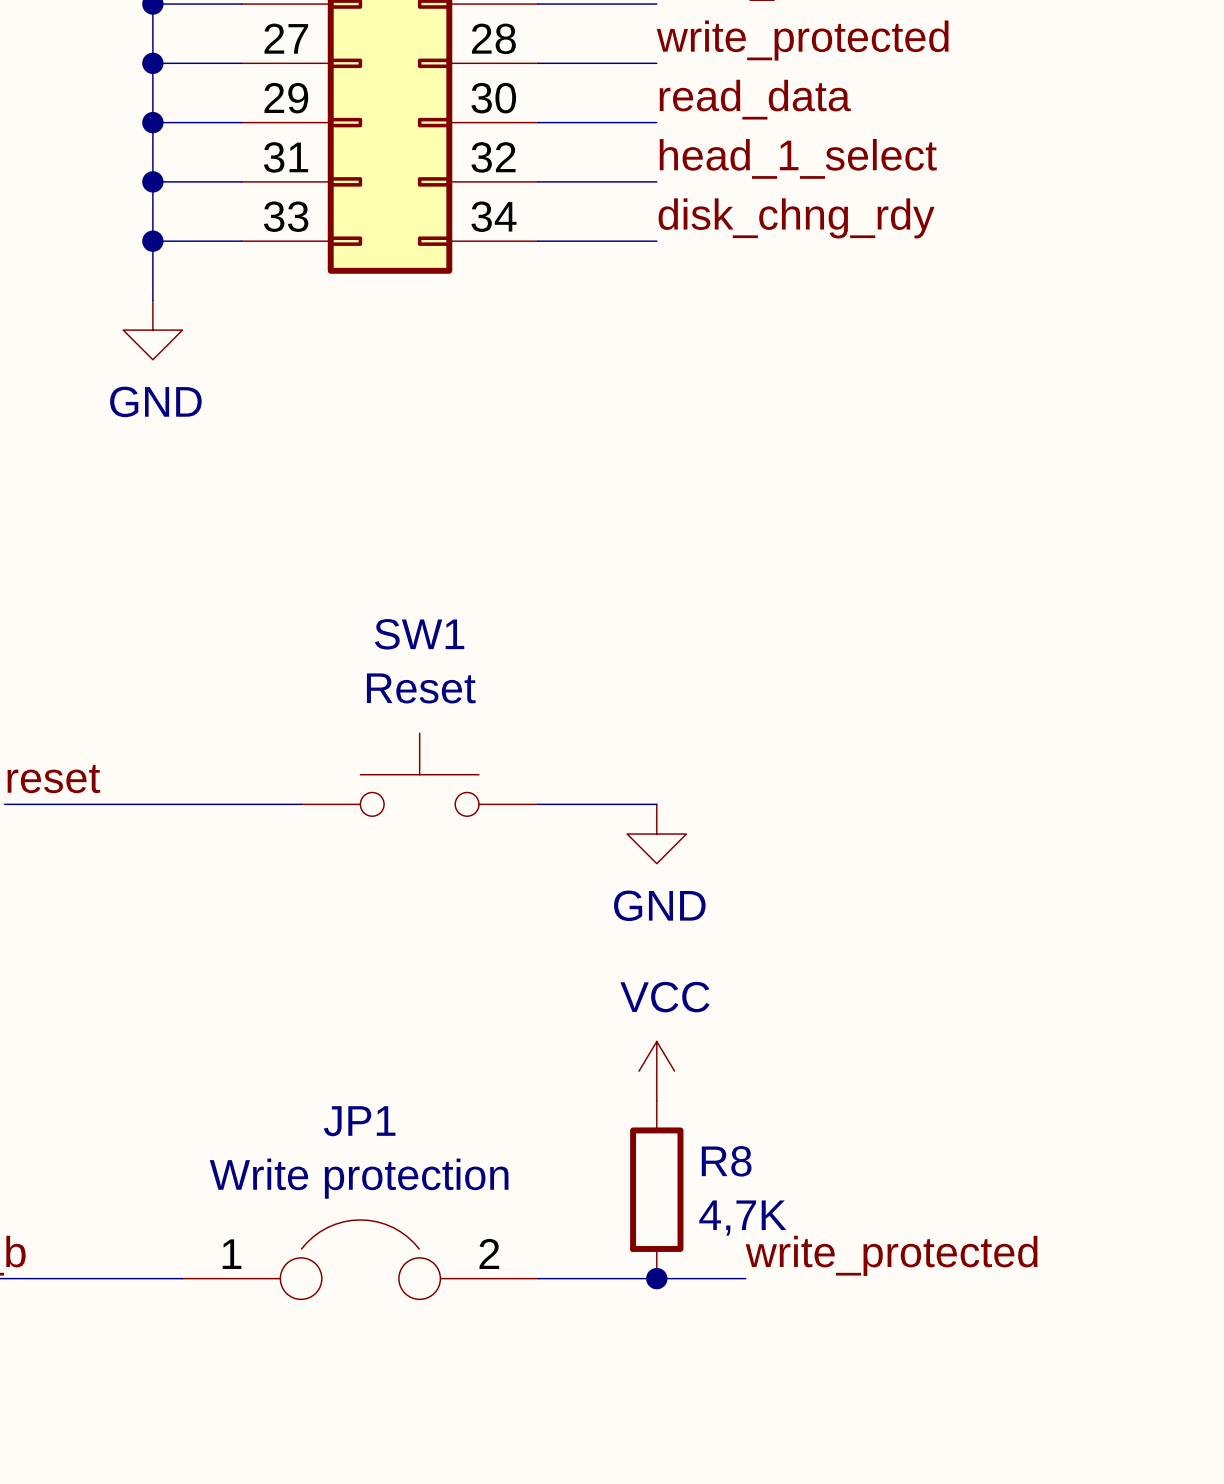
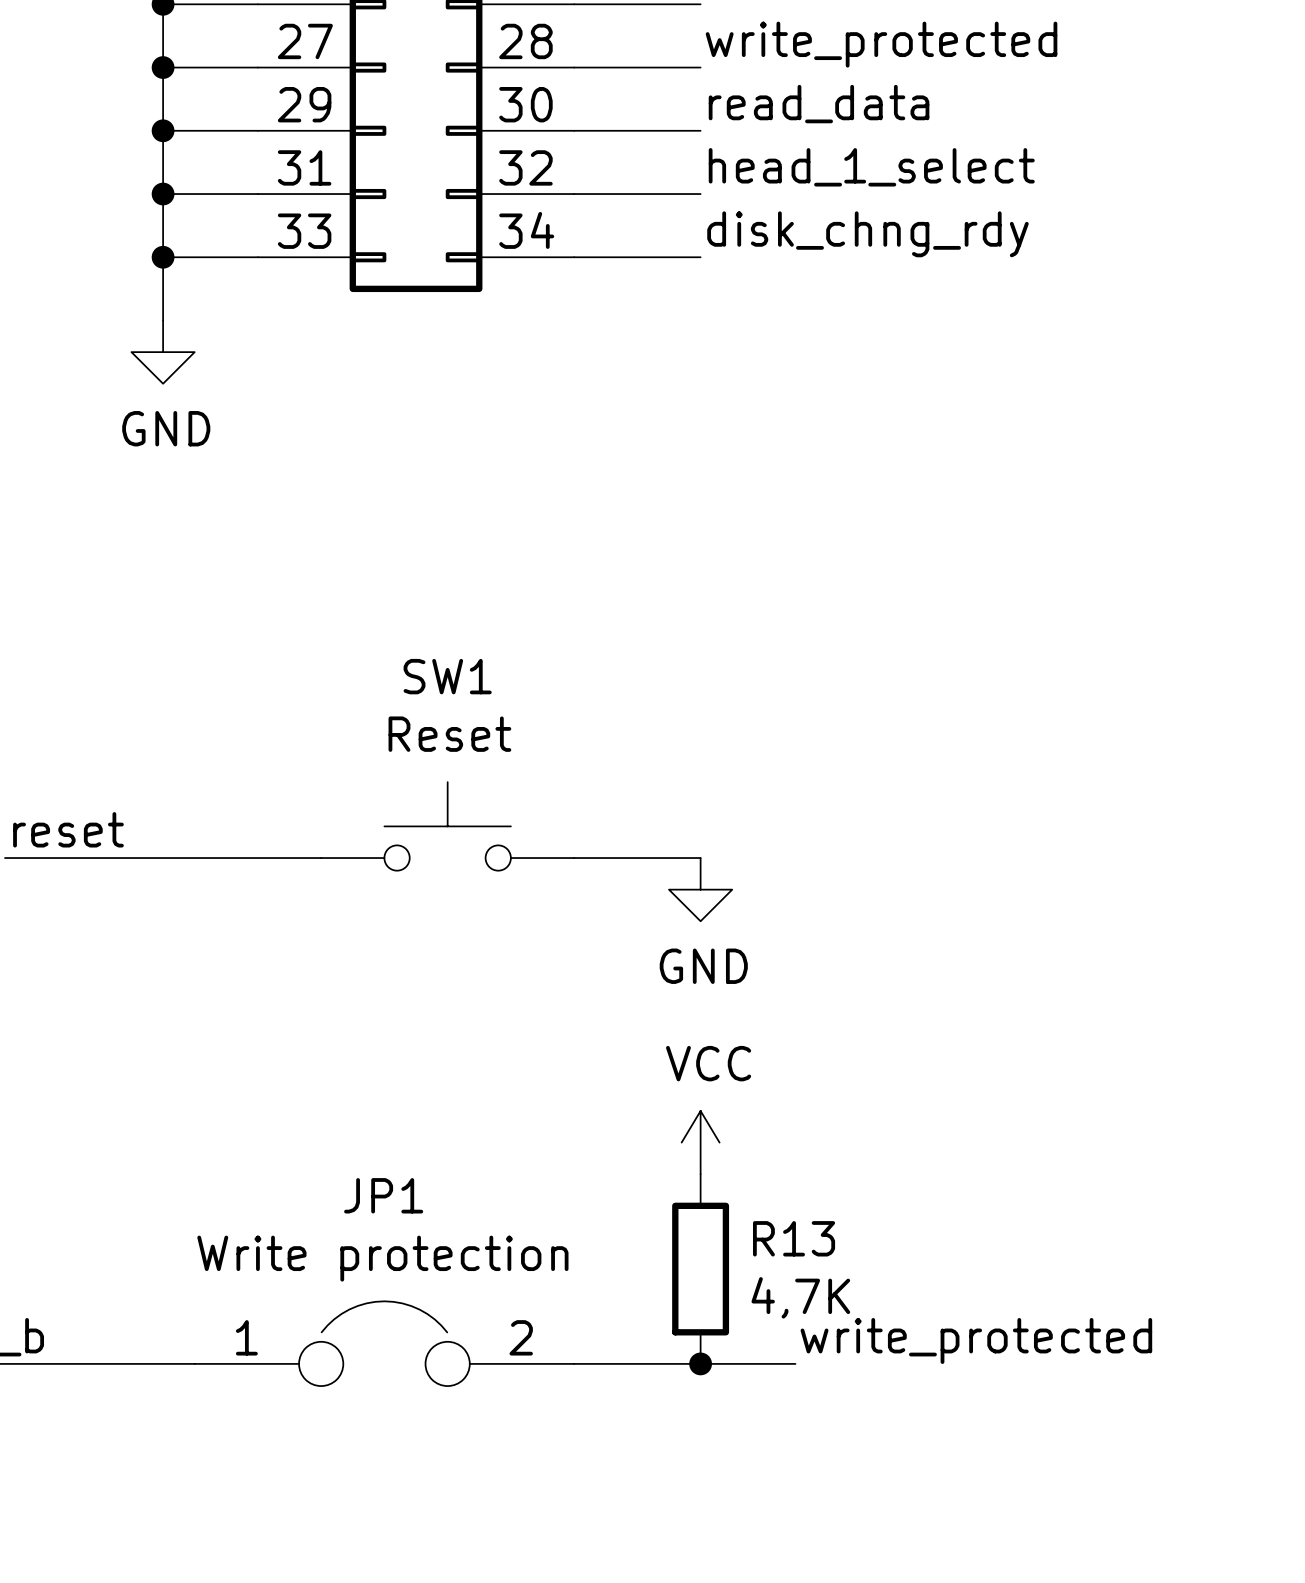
R8 name: R8 (726, 1161) -> R13 (794, 1238)

